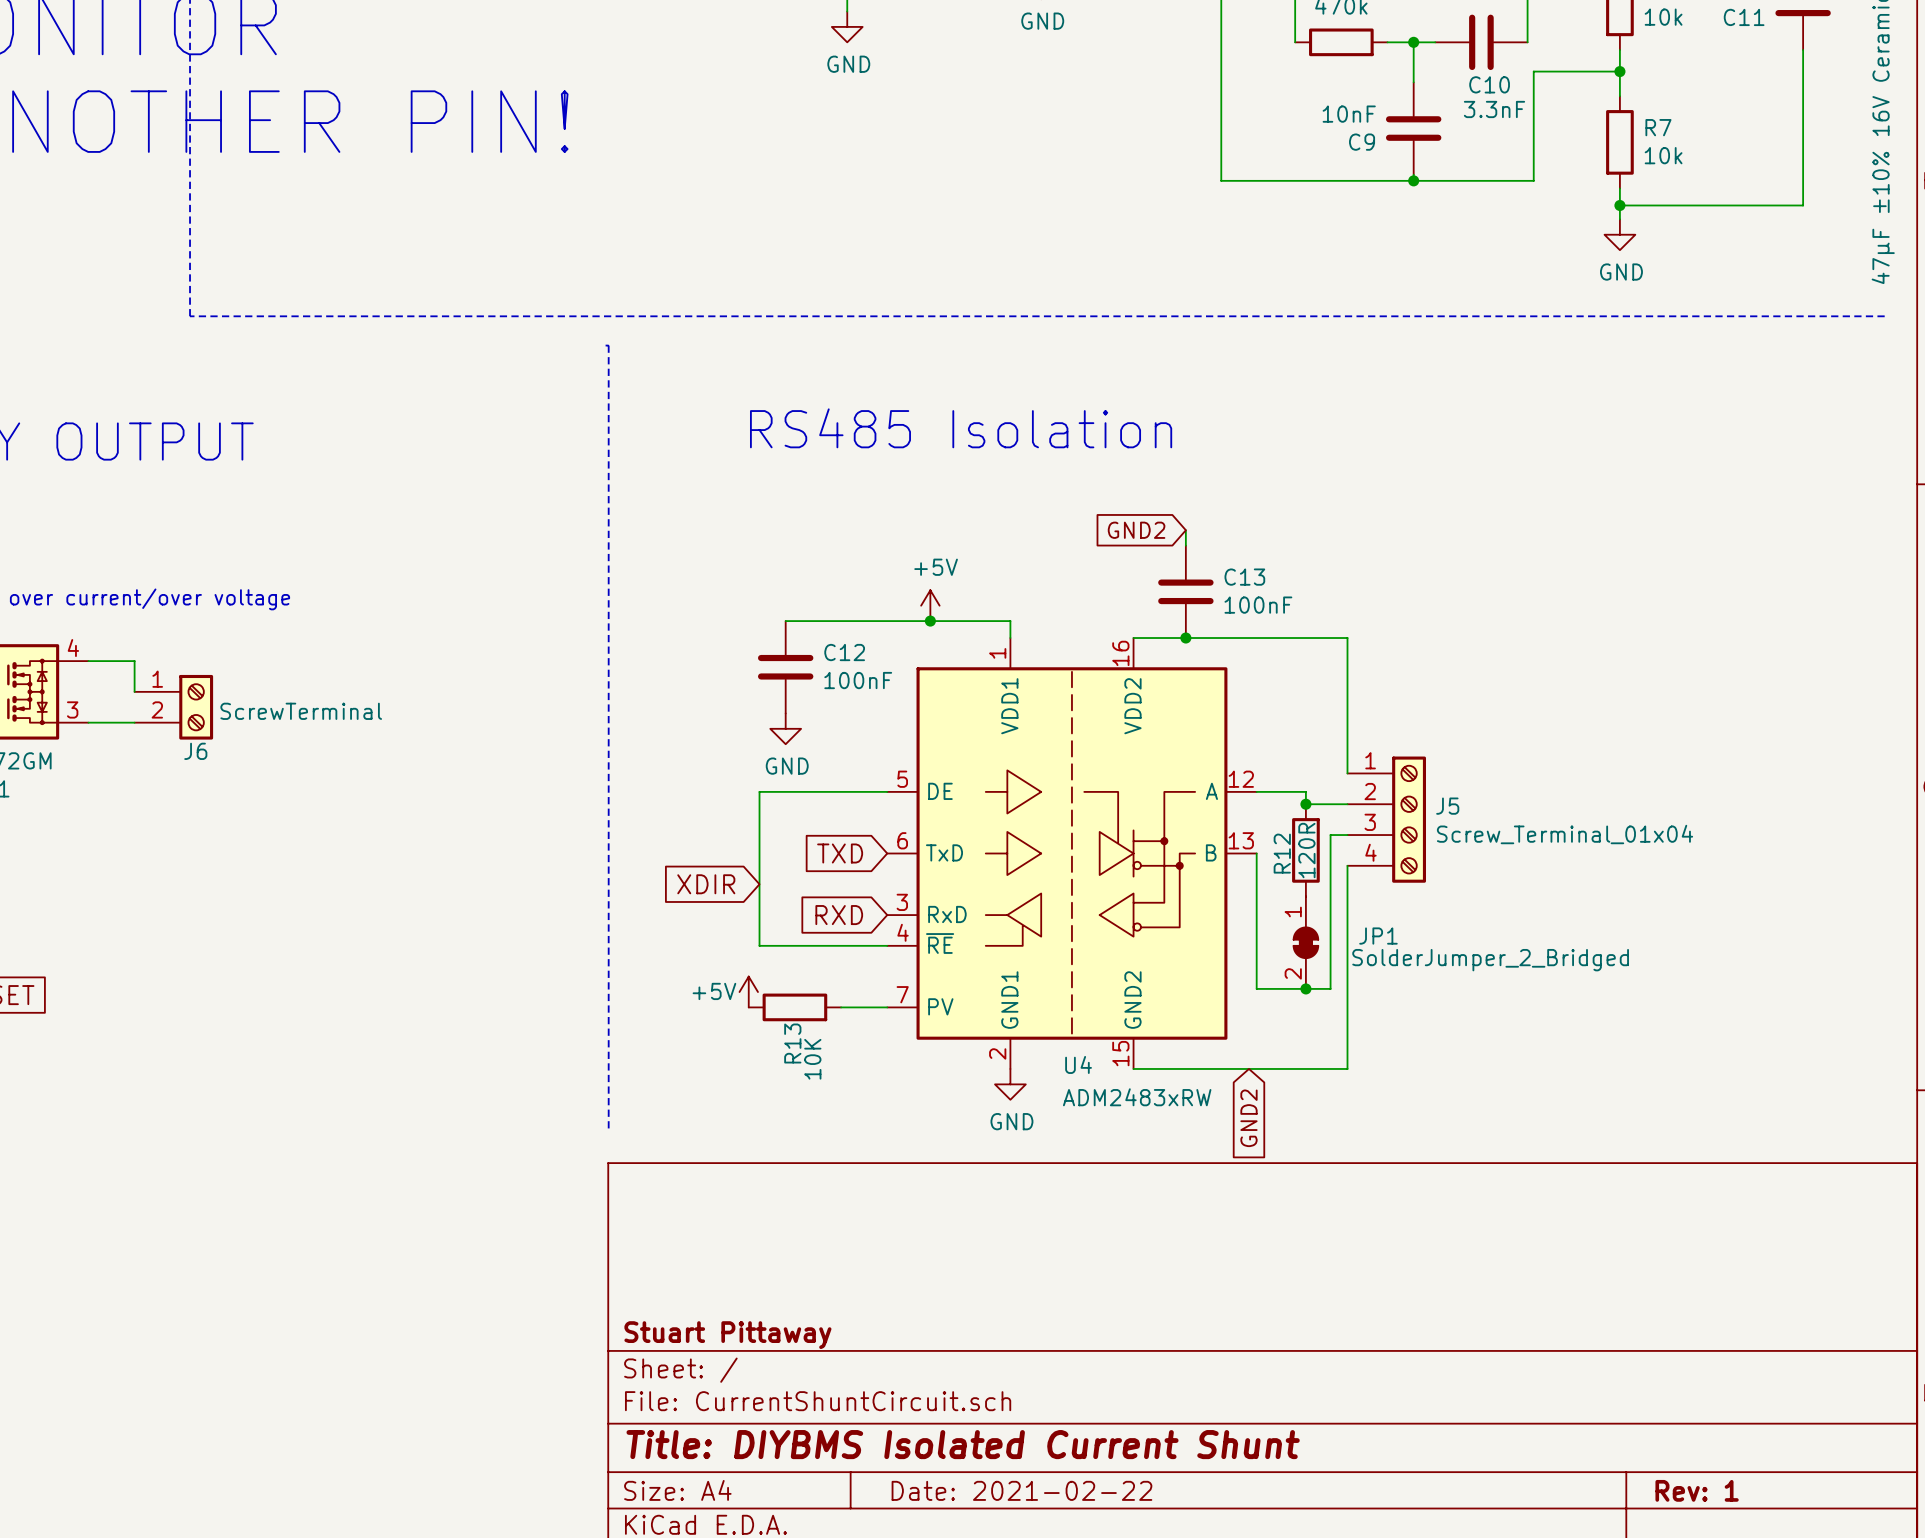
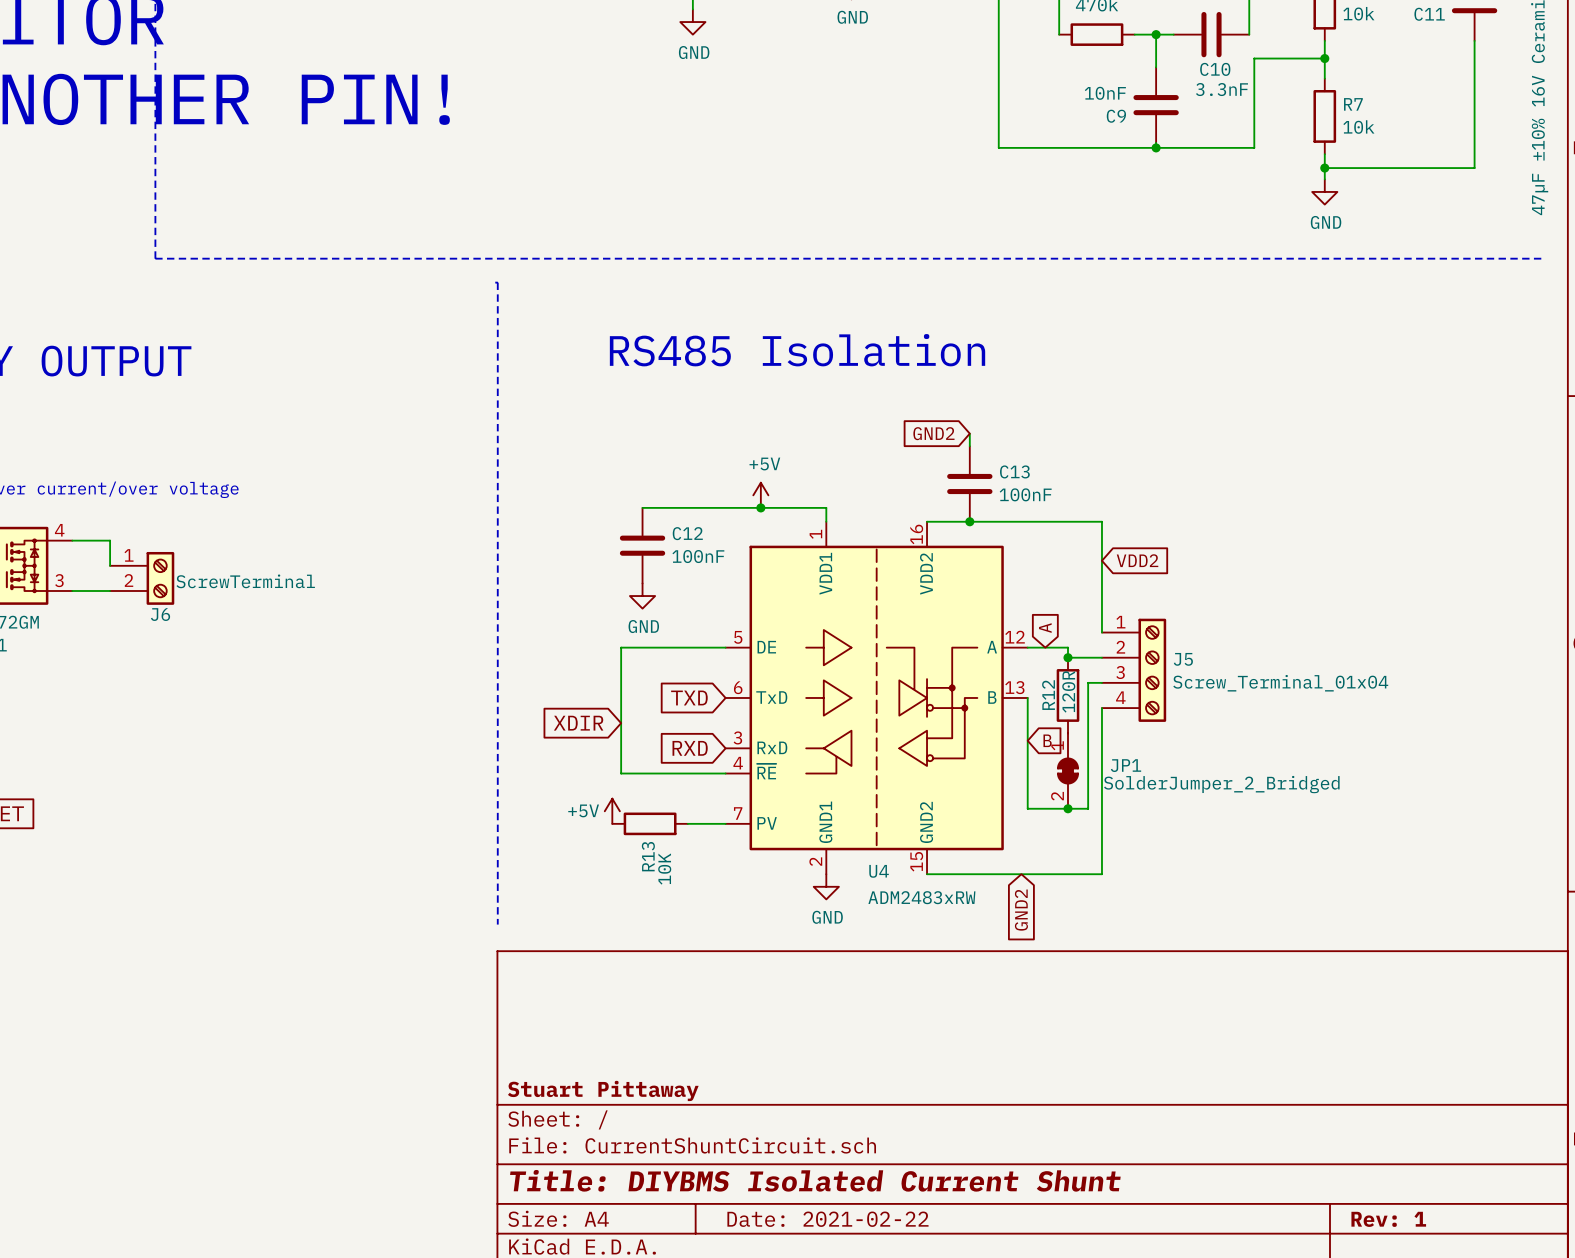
global label: none -> VDD2 (1137, 560)
global label: none -> A (1045, 628)
global label: none -> B (1047, 740)

